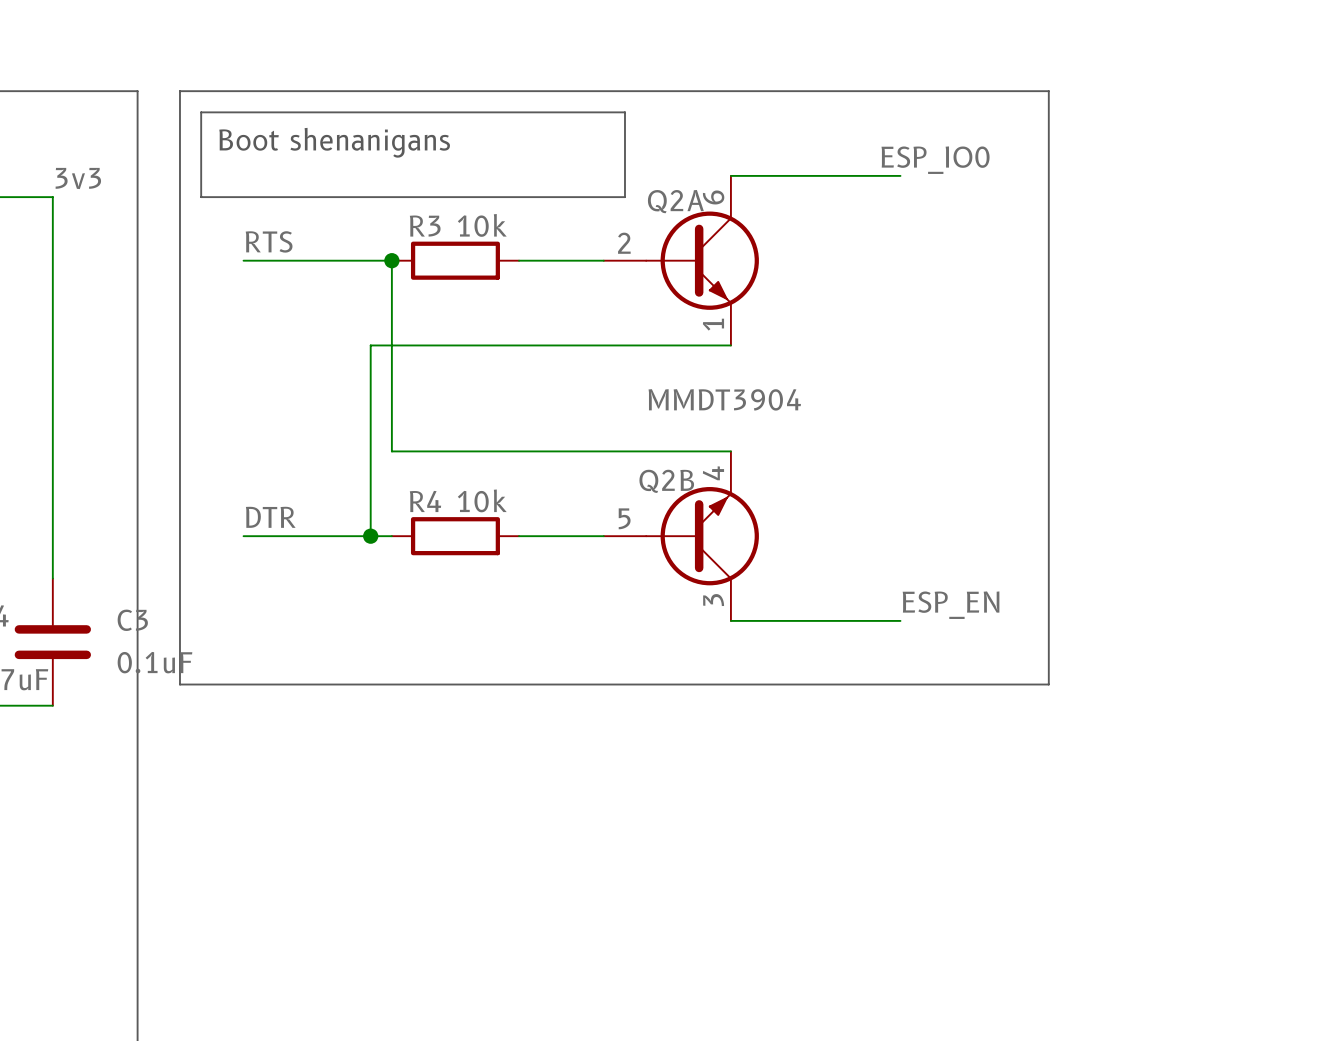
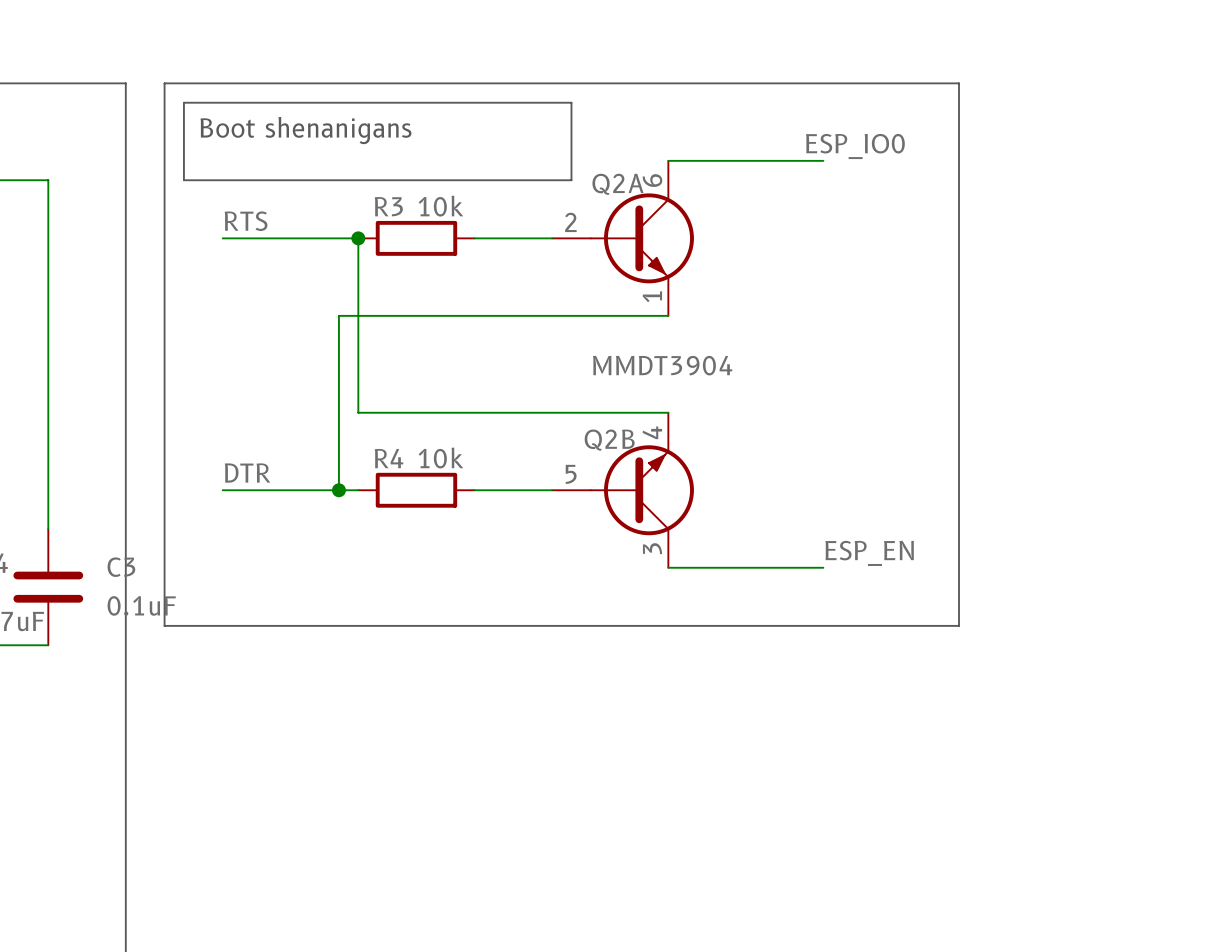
label: 3v3 (78, 178) -> none

